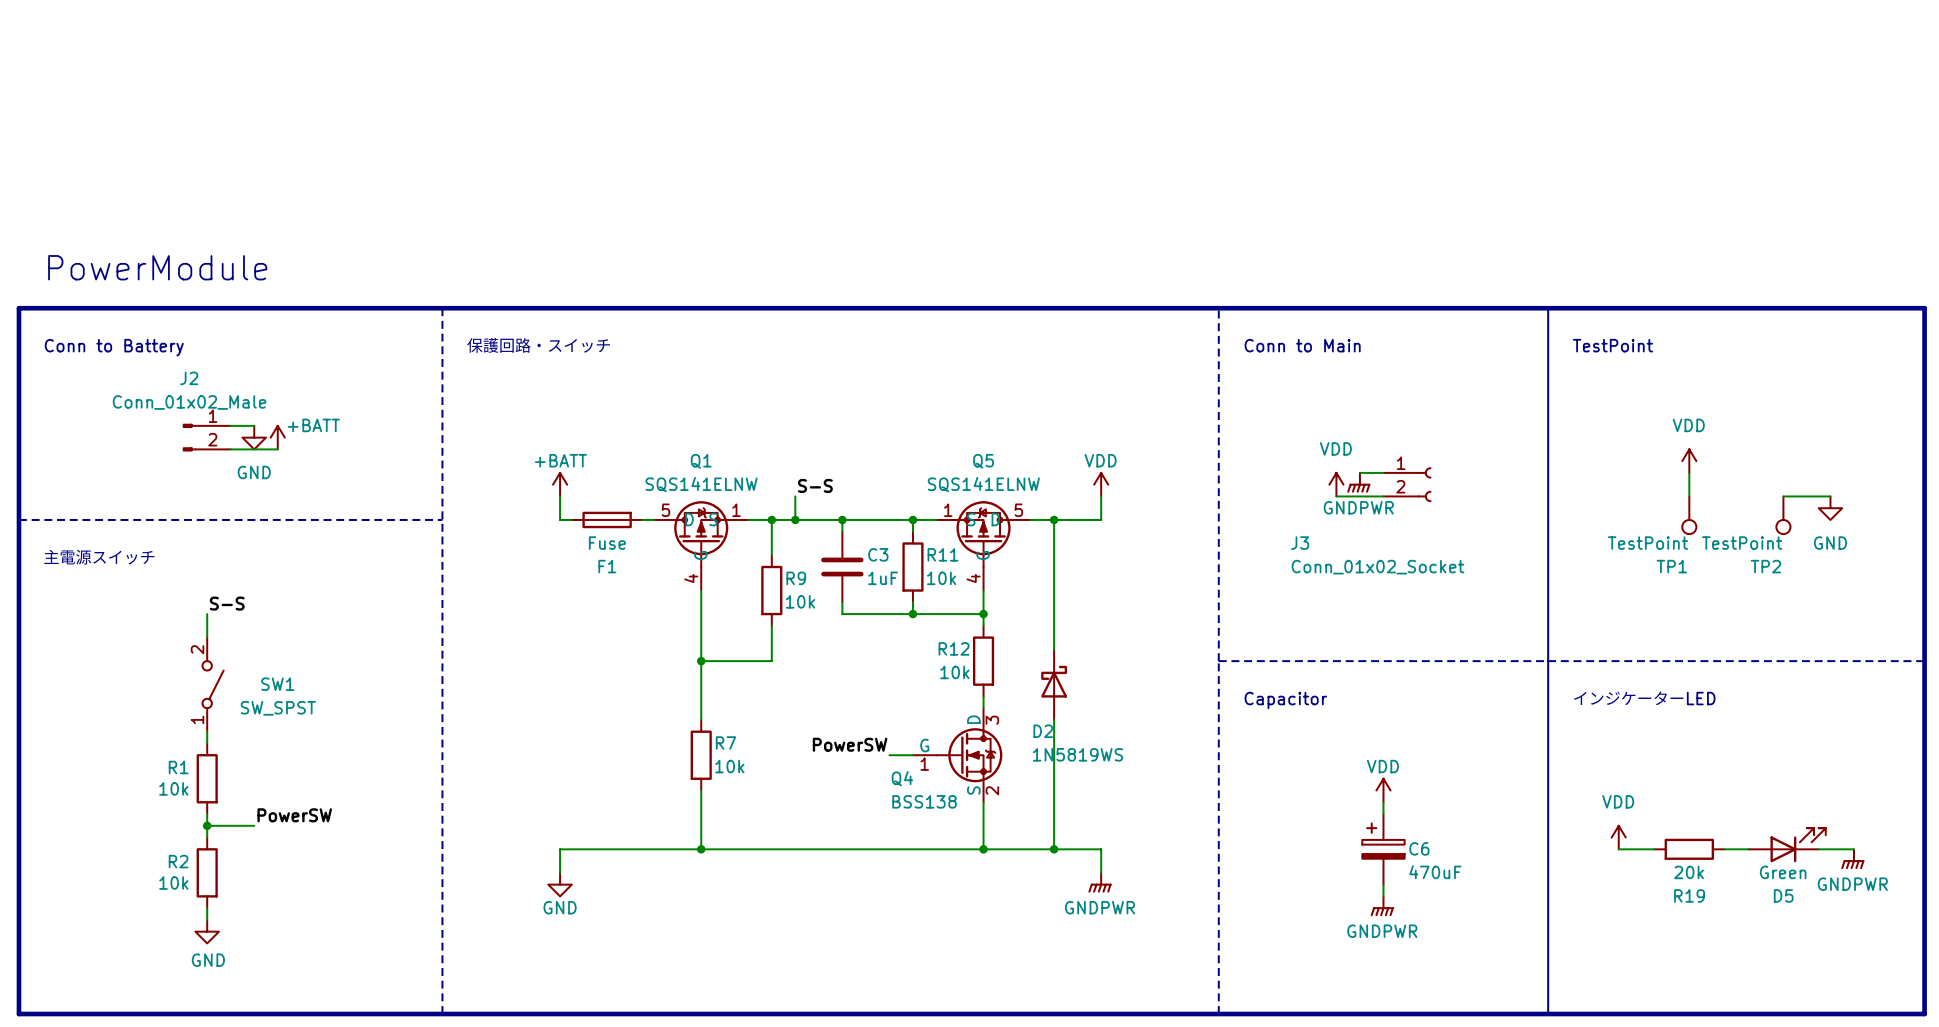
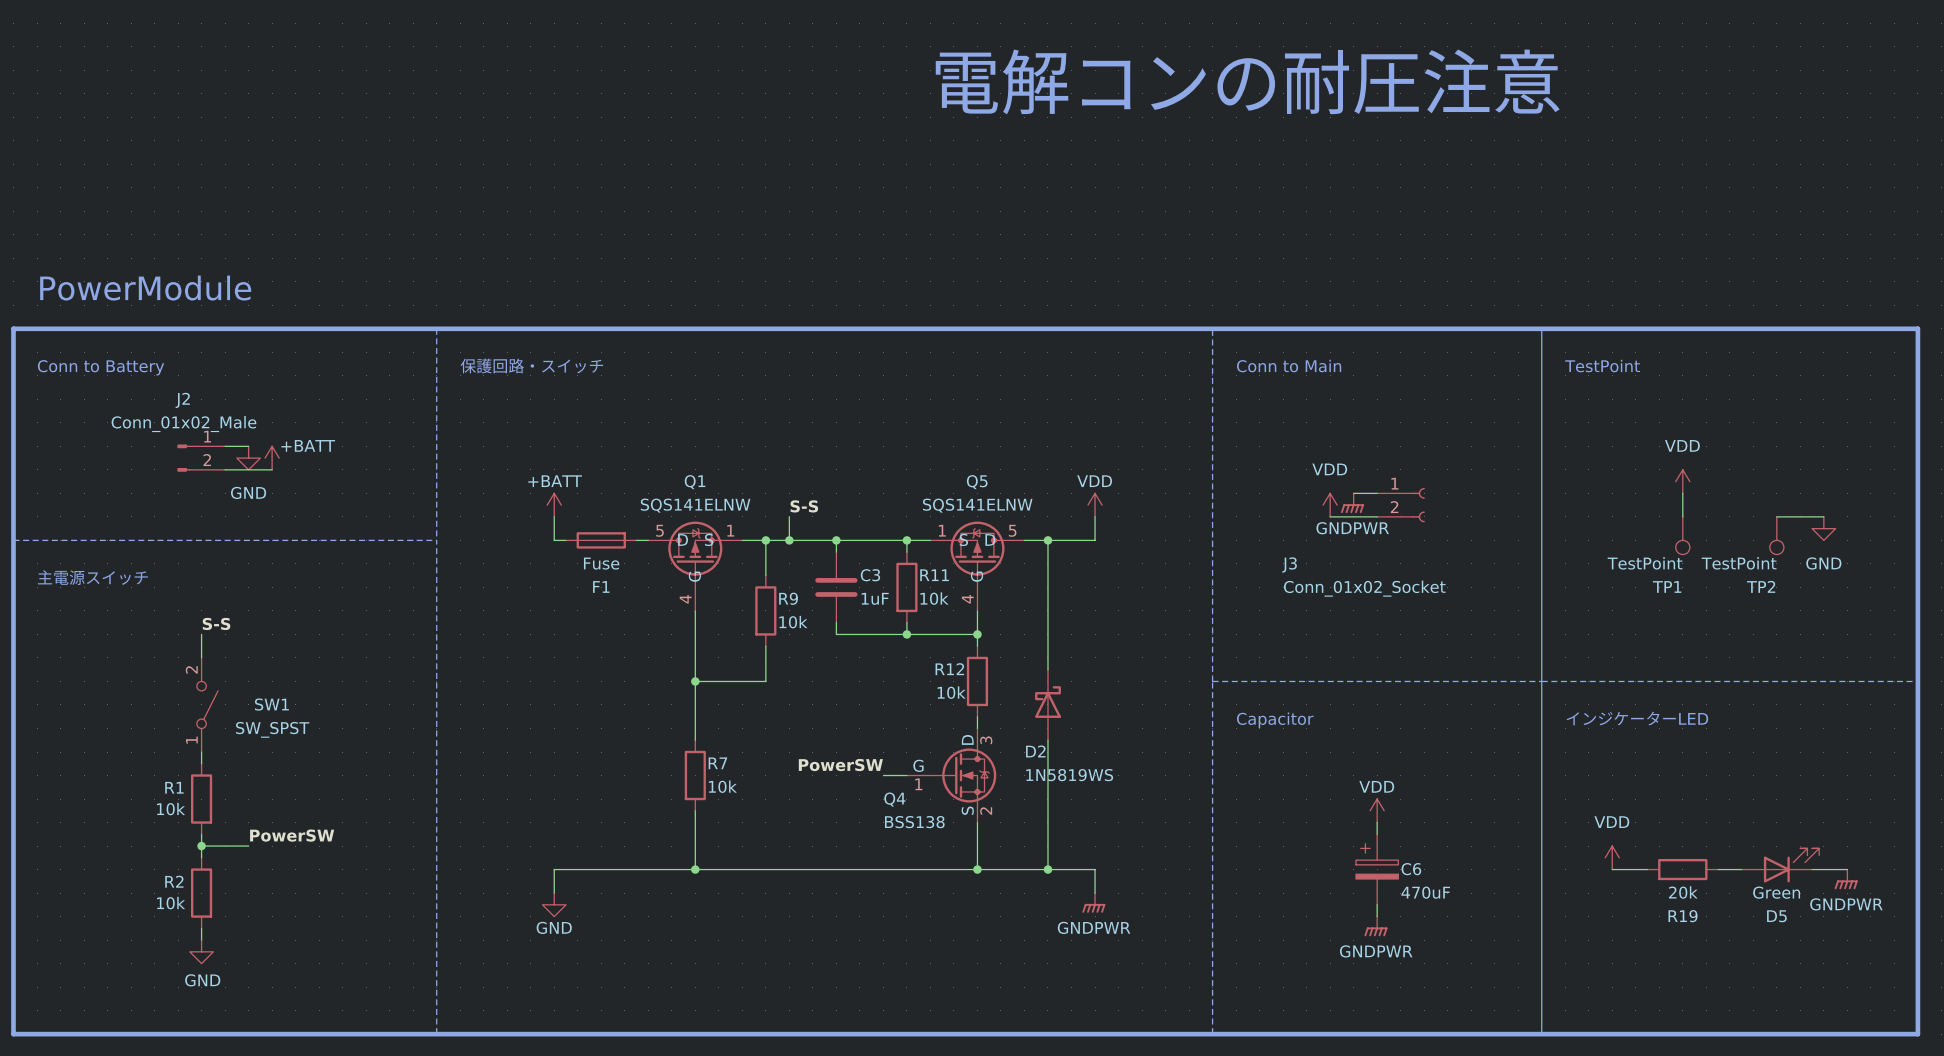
text: none -> 電解コンの耐圧注意 (1247, 81)

